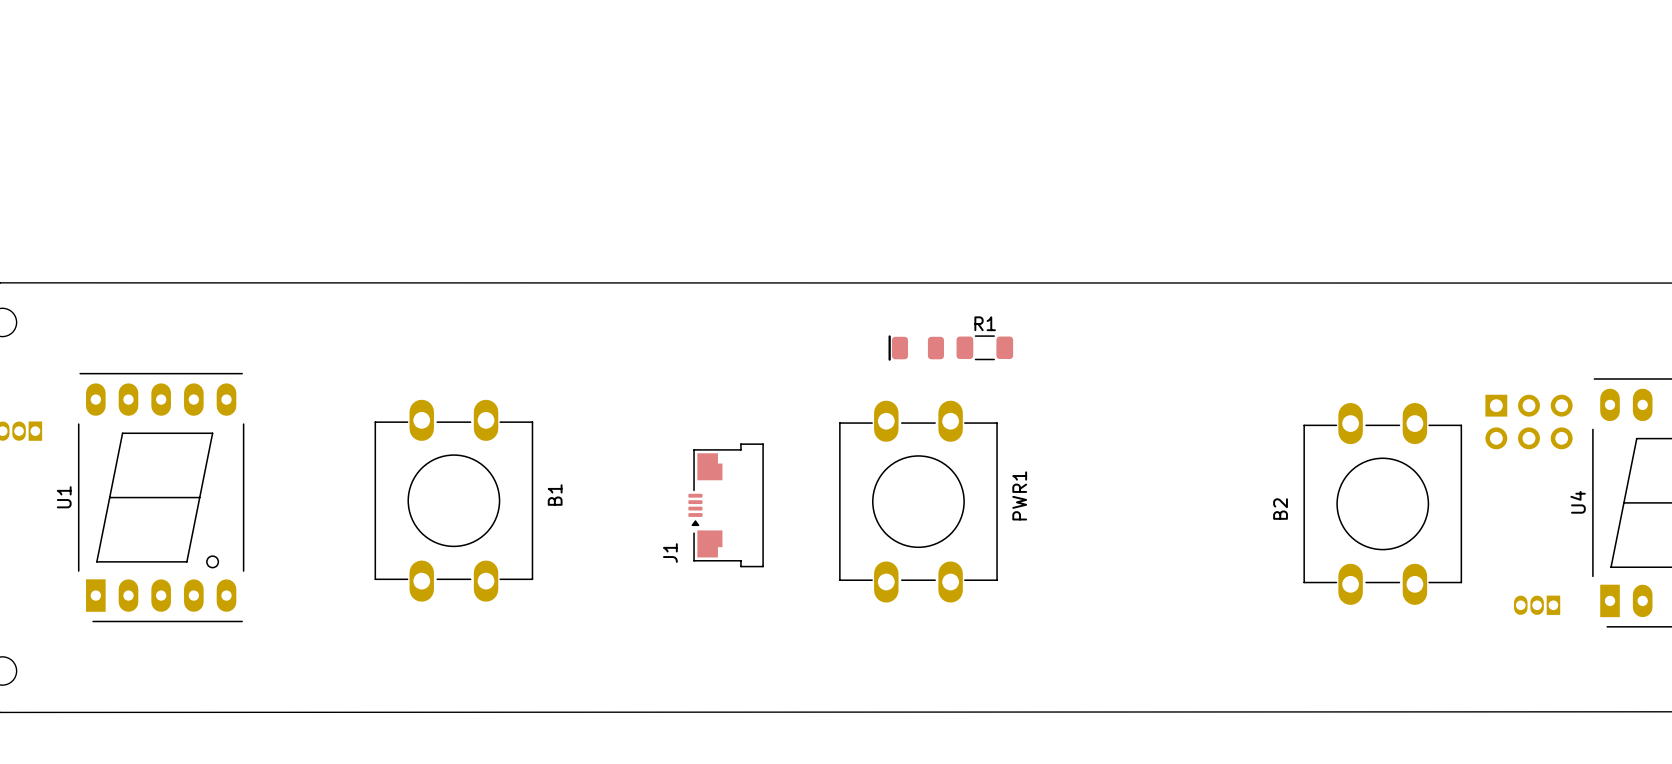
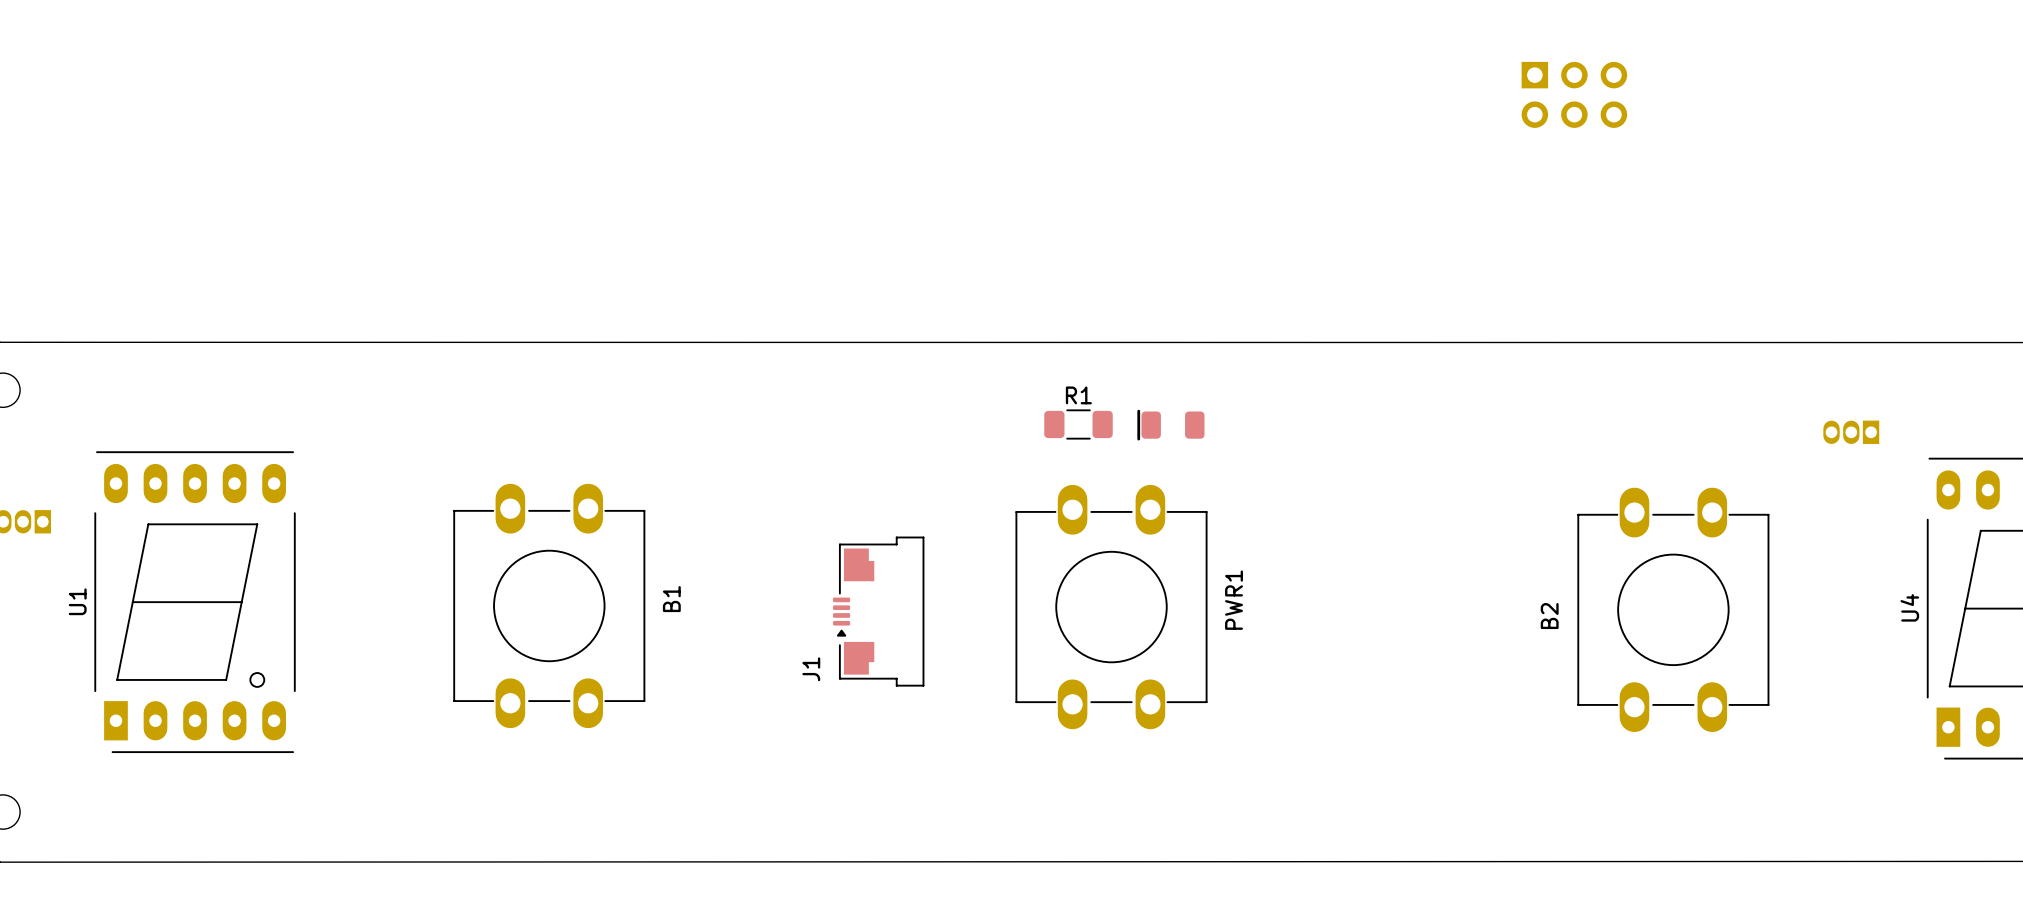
part: none -> (1574, 94)
R1 position: (984, 347) -> (1078, 424)
part position: (916, 348) -> (1170, 425)
part: (1529, 421) -> none
part position: (1537, 605) -> (1851, 432)

